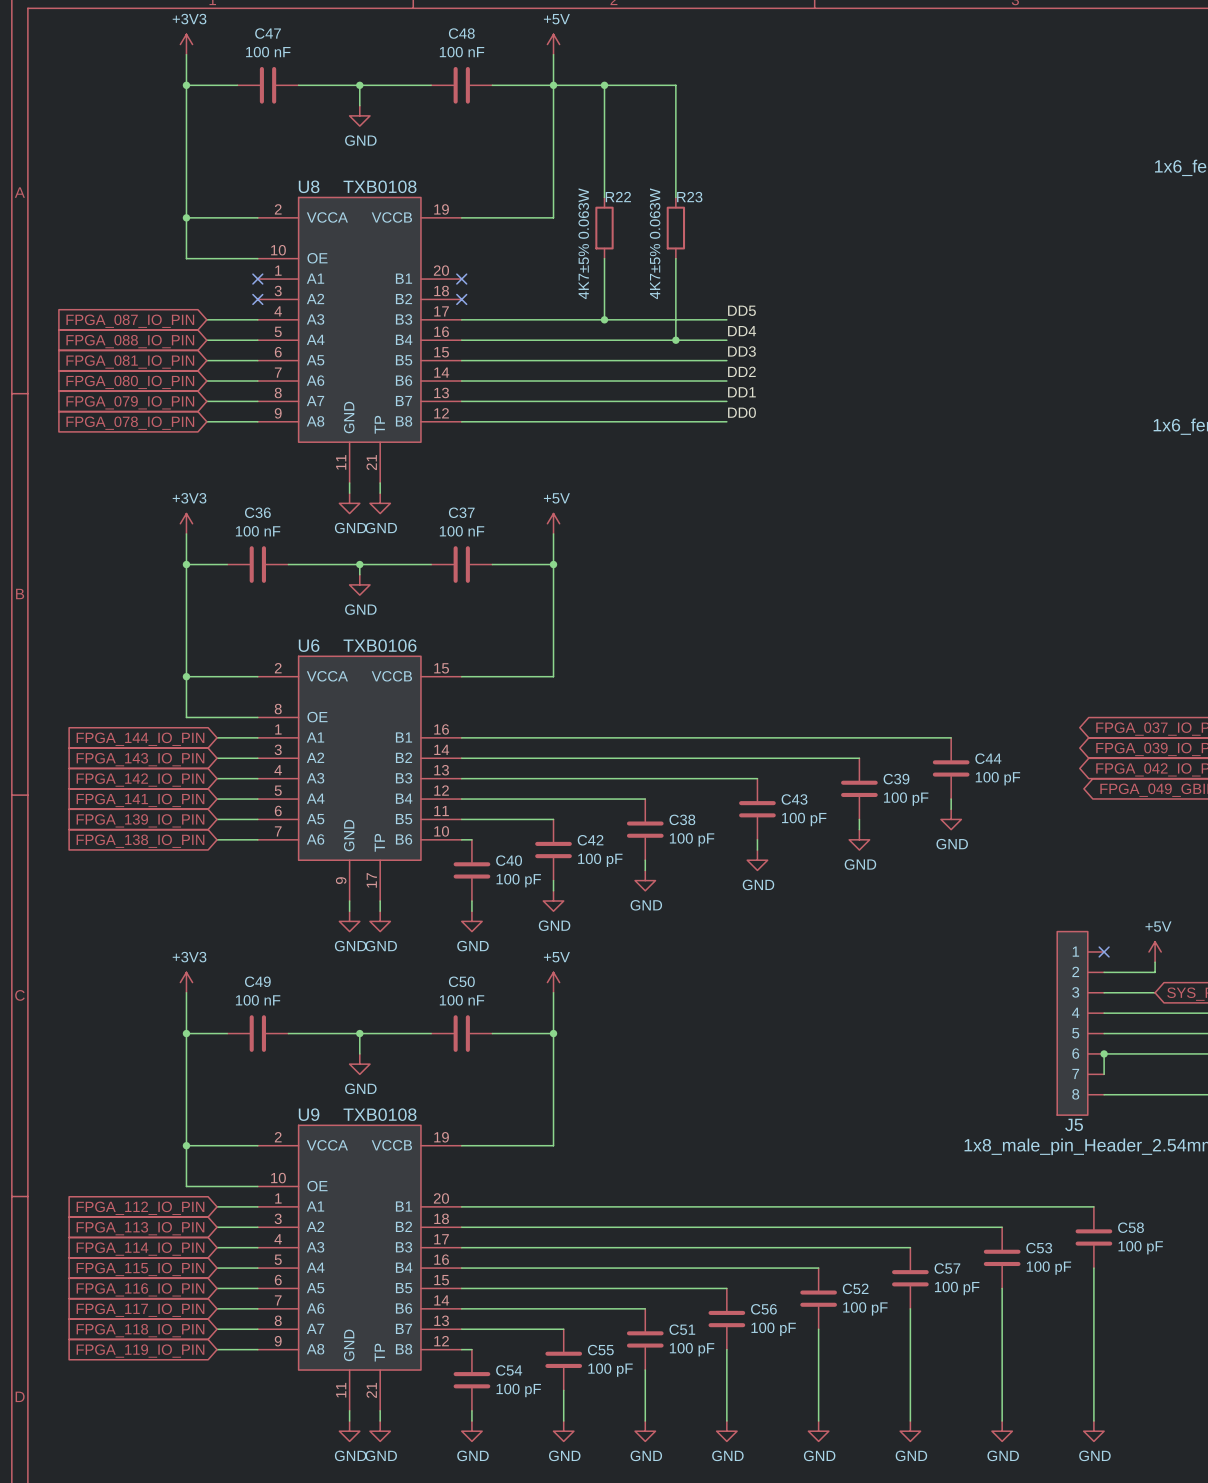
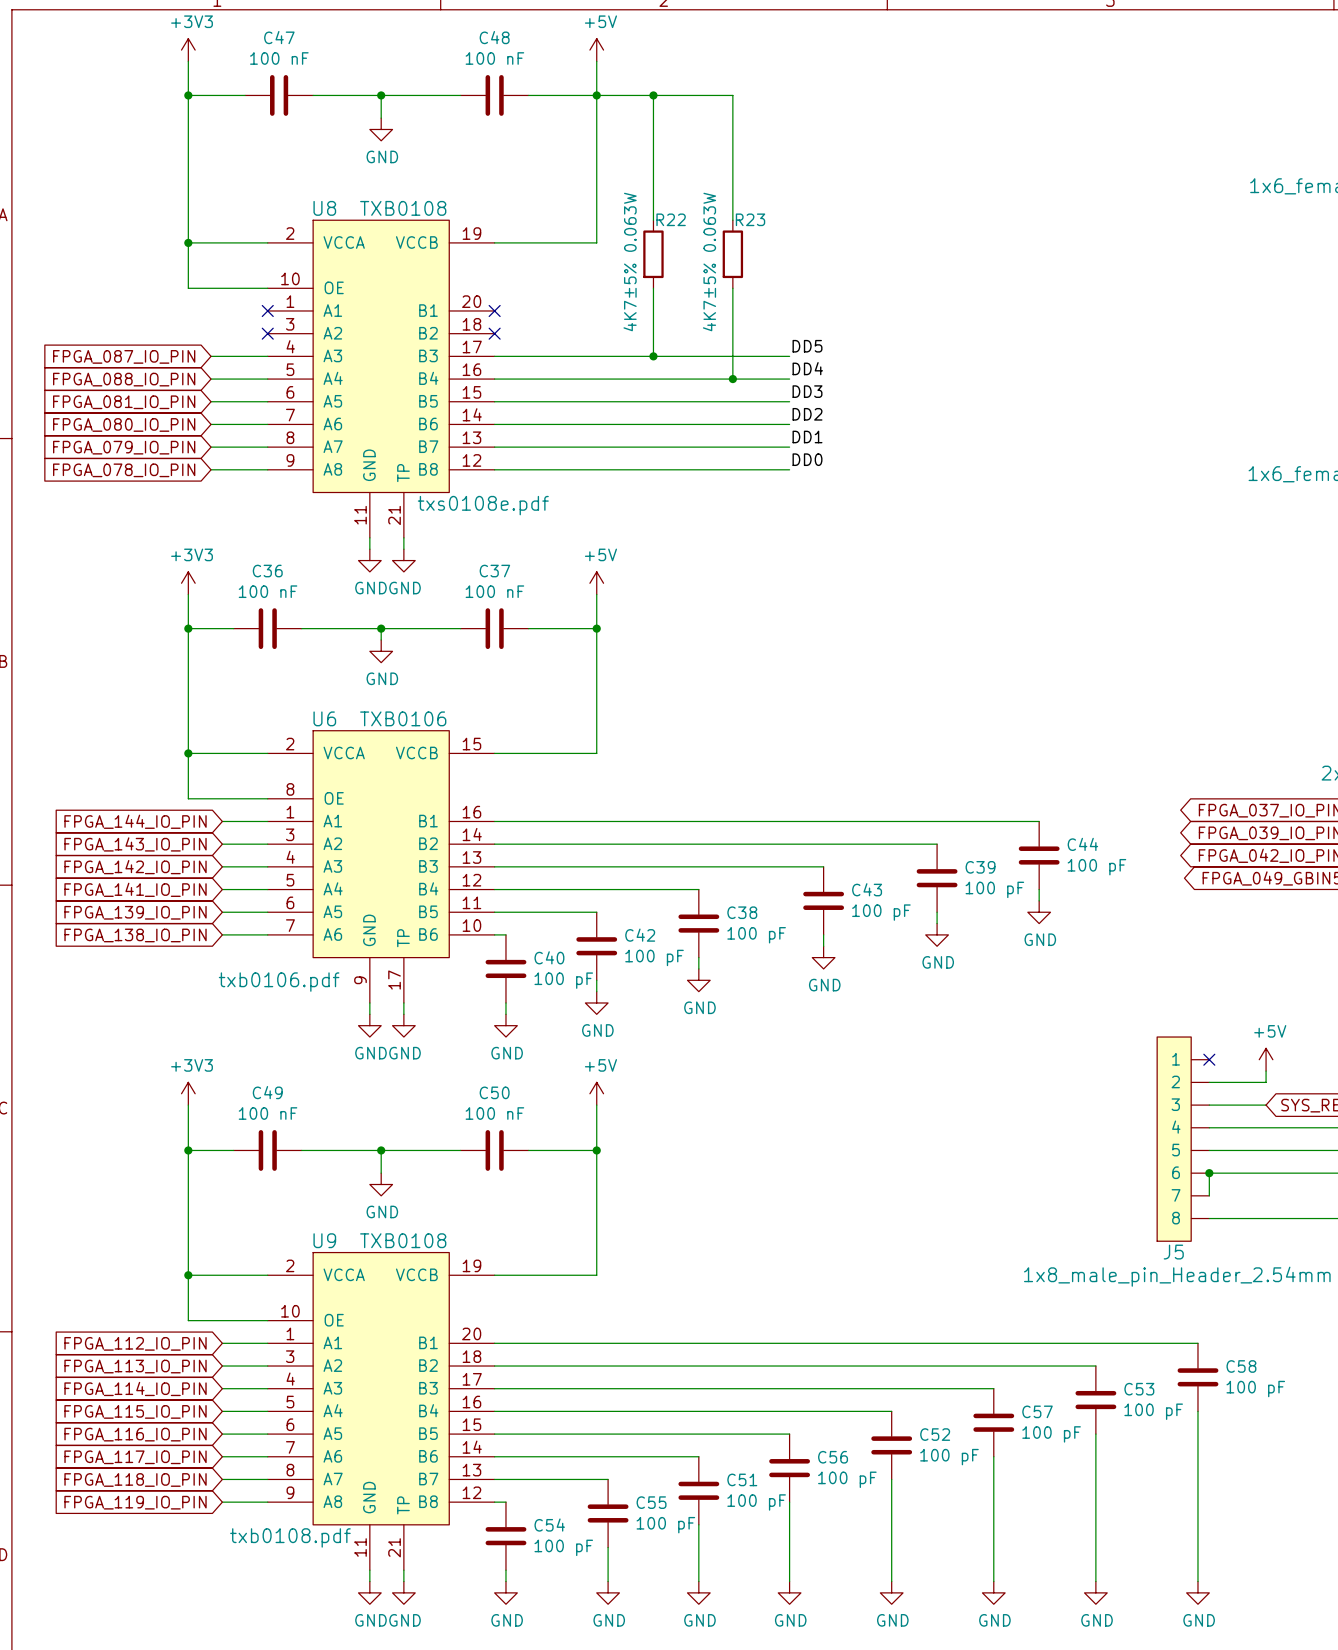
U8 text: none -> txs0108e.pdf (483, 505)
U6 text: none -> txb0106.pdf (279, 982)
U9 text: none -> txb0108.pdf (290, 1537)

